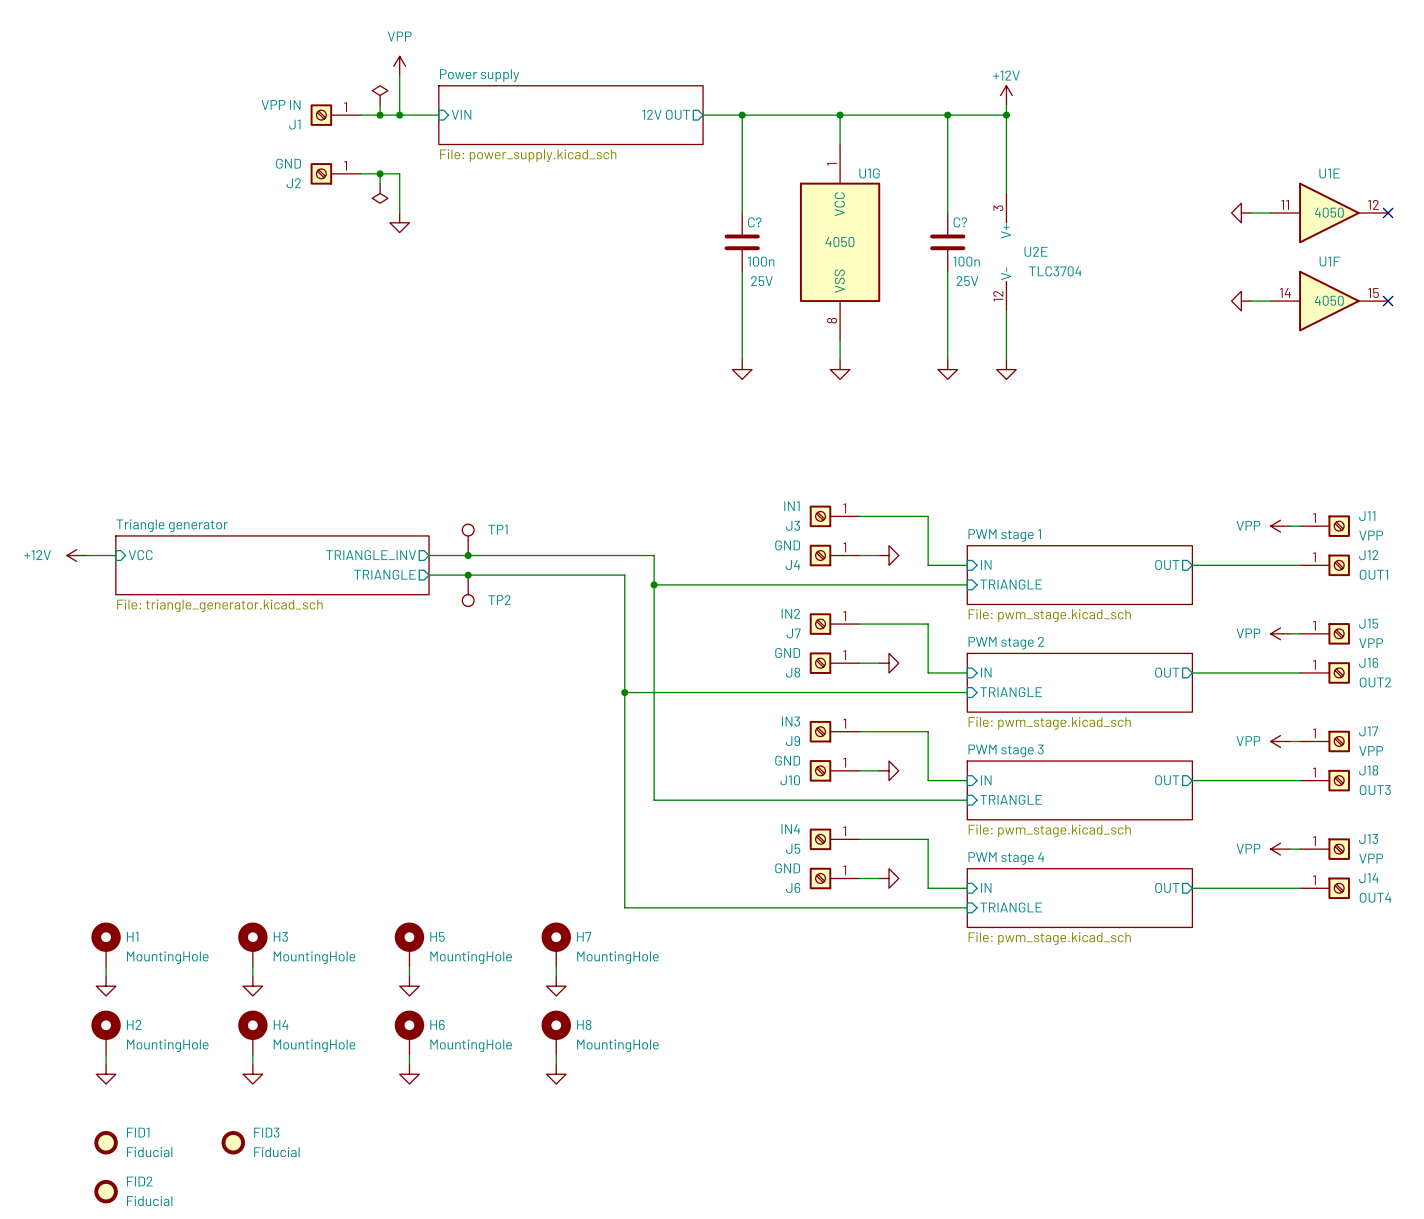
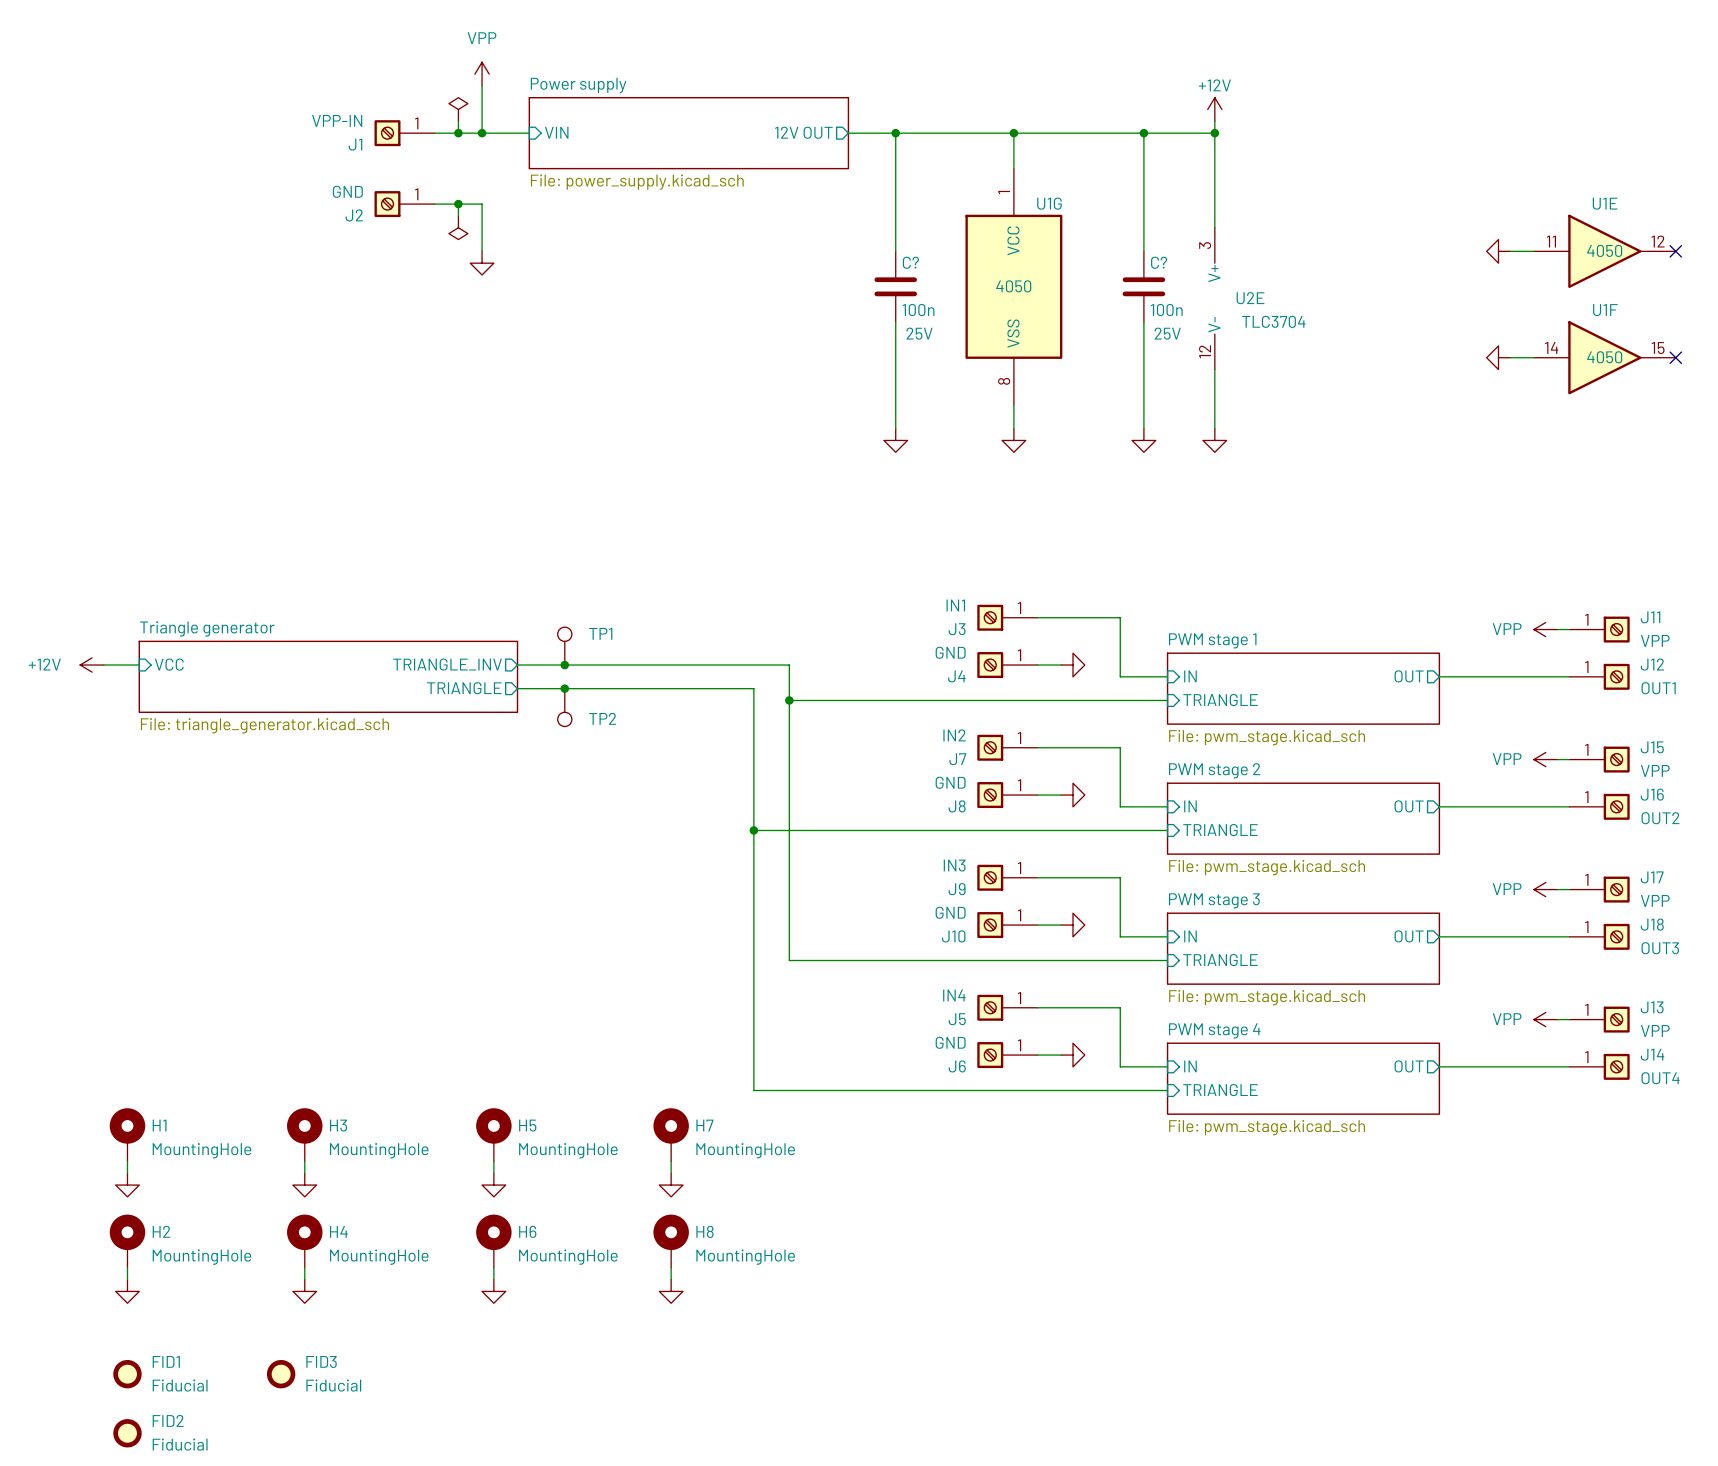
J1 text: VPP IN (281, 104) -> VPP-IN (337, 120)

